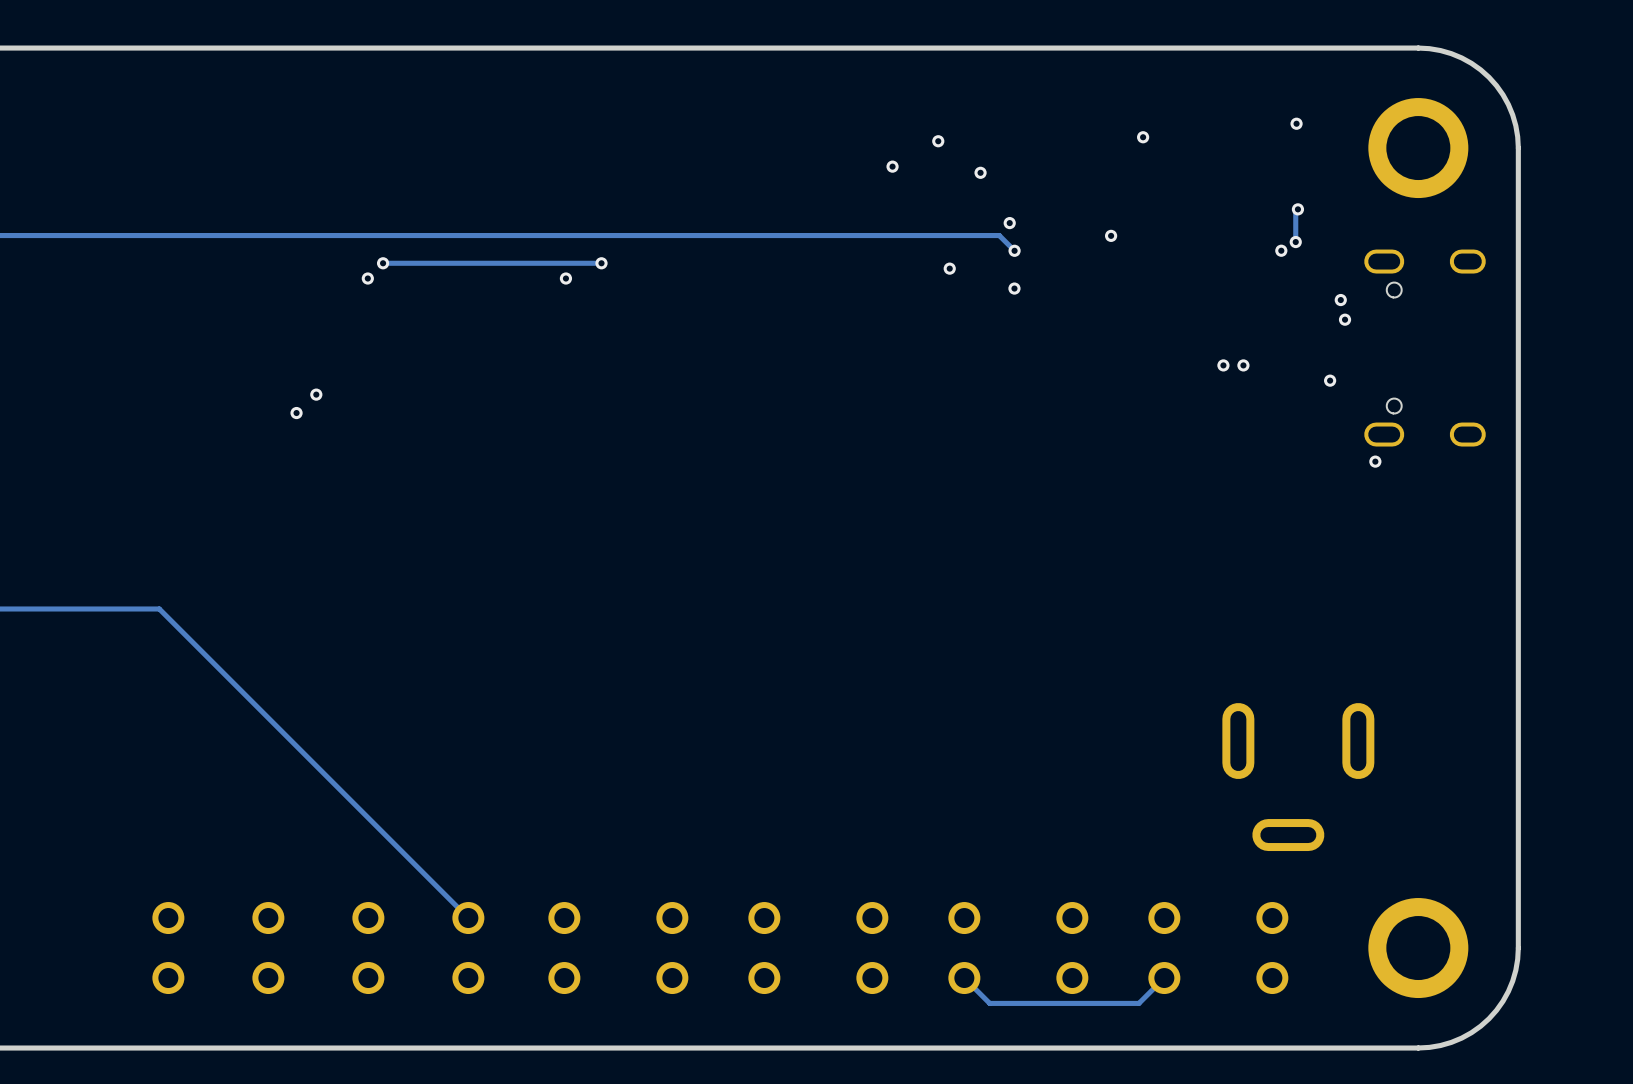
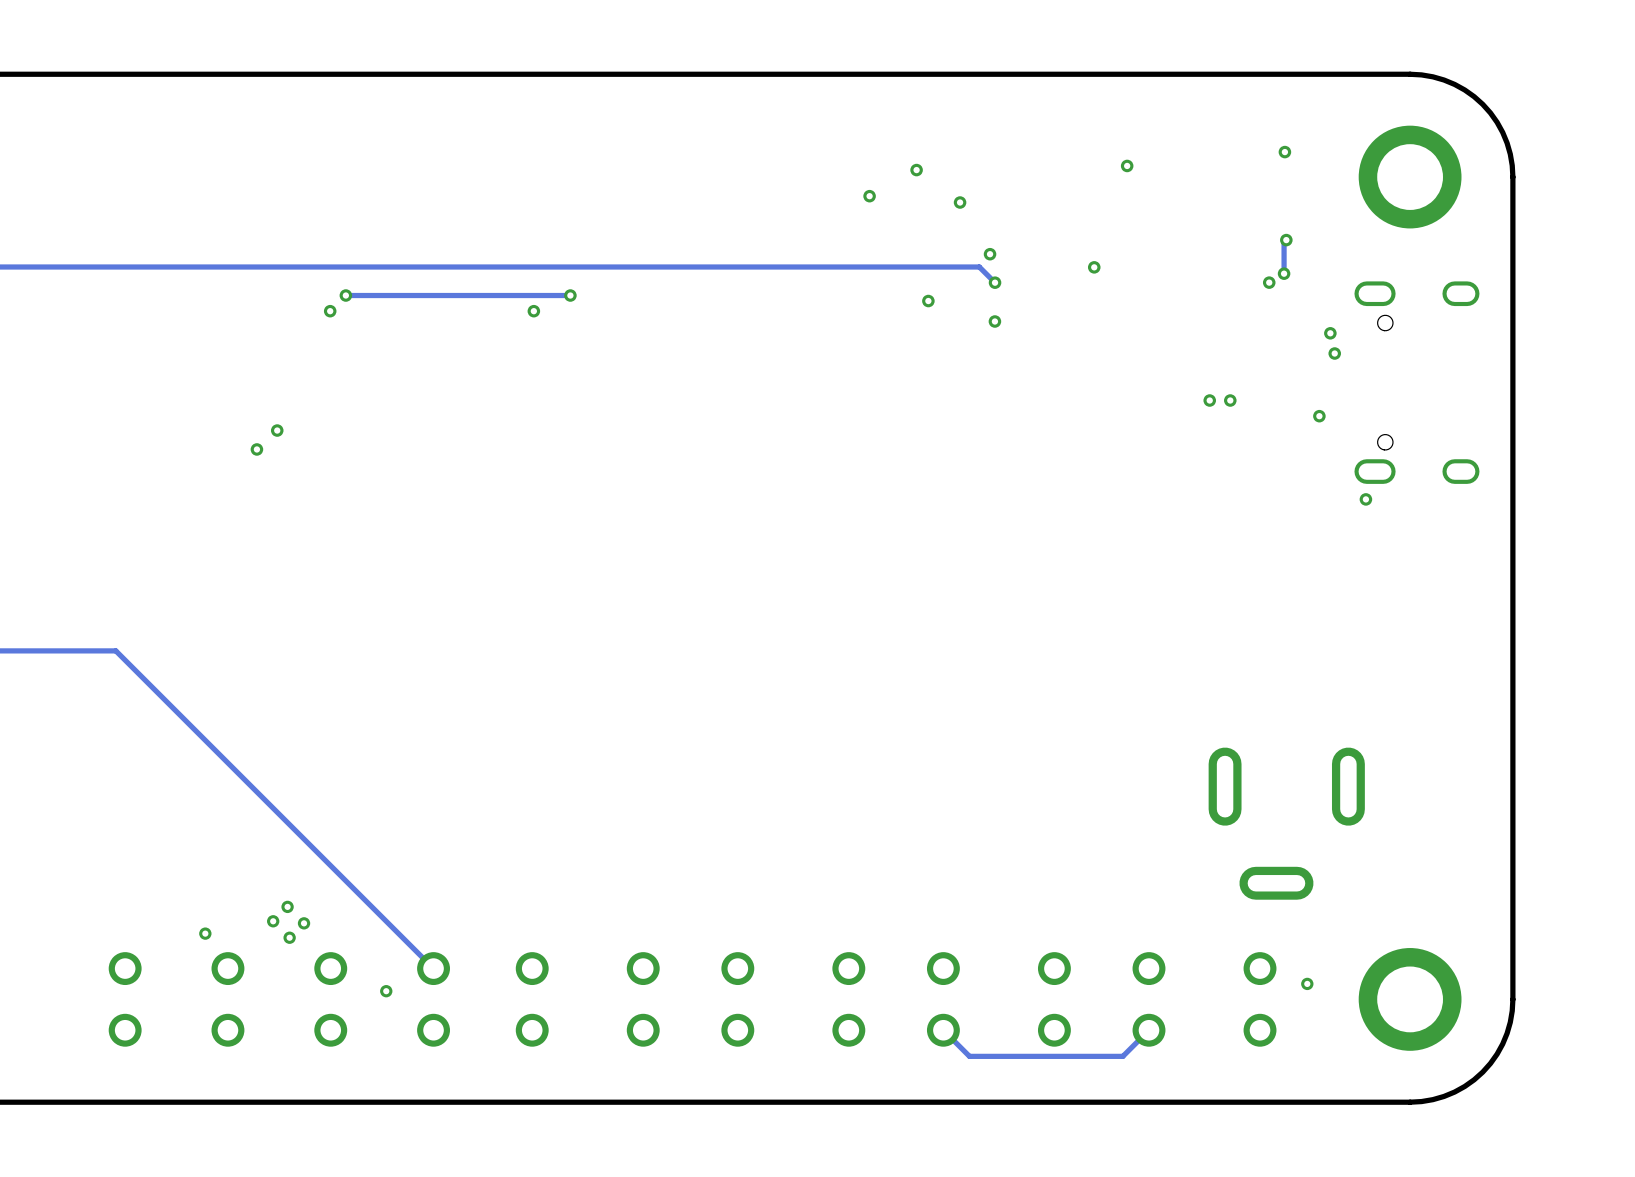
via: none -> (287, 906)
via: none -> (273, 921)
via: none -> (304, 923)
via: none -> (205, 933)
via: none -> (289, 937)
via: none -> (1307, 983)
via: none -> (386, 991)

